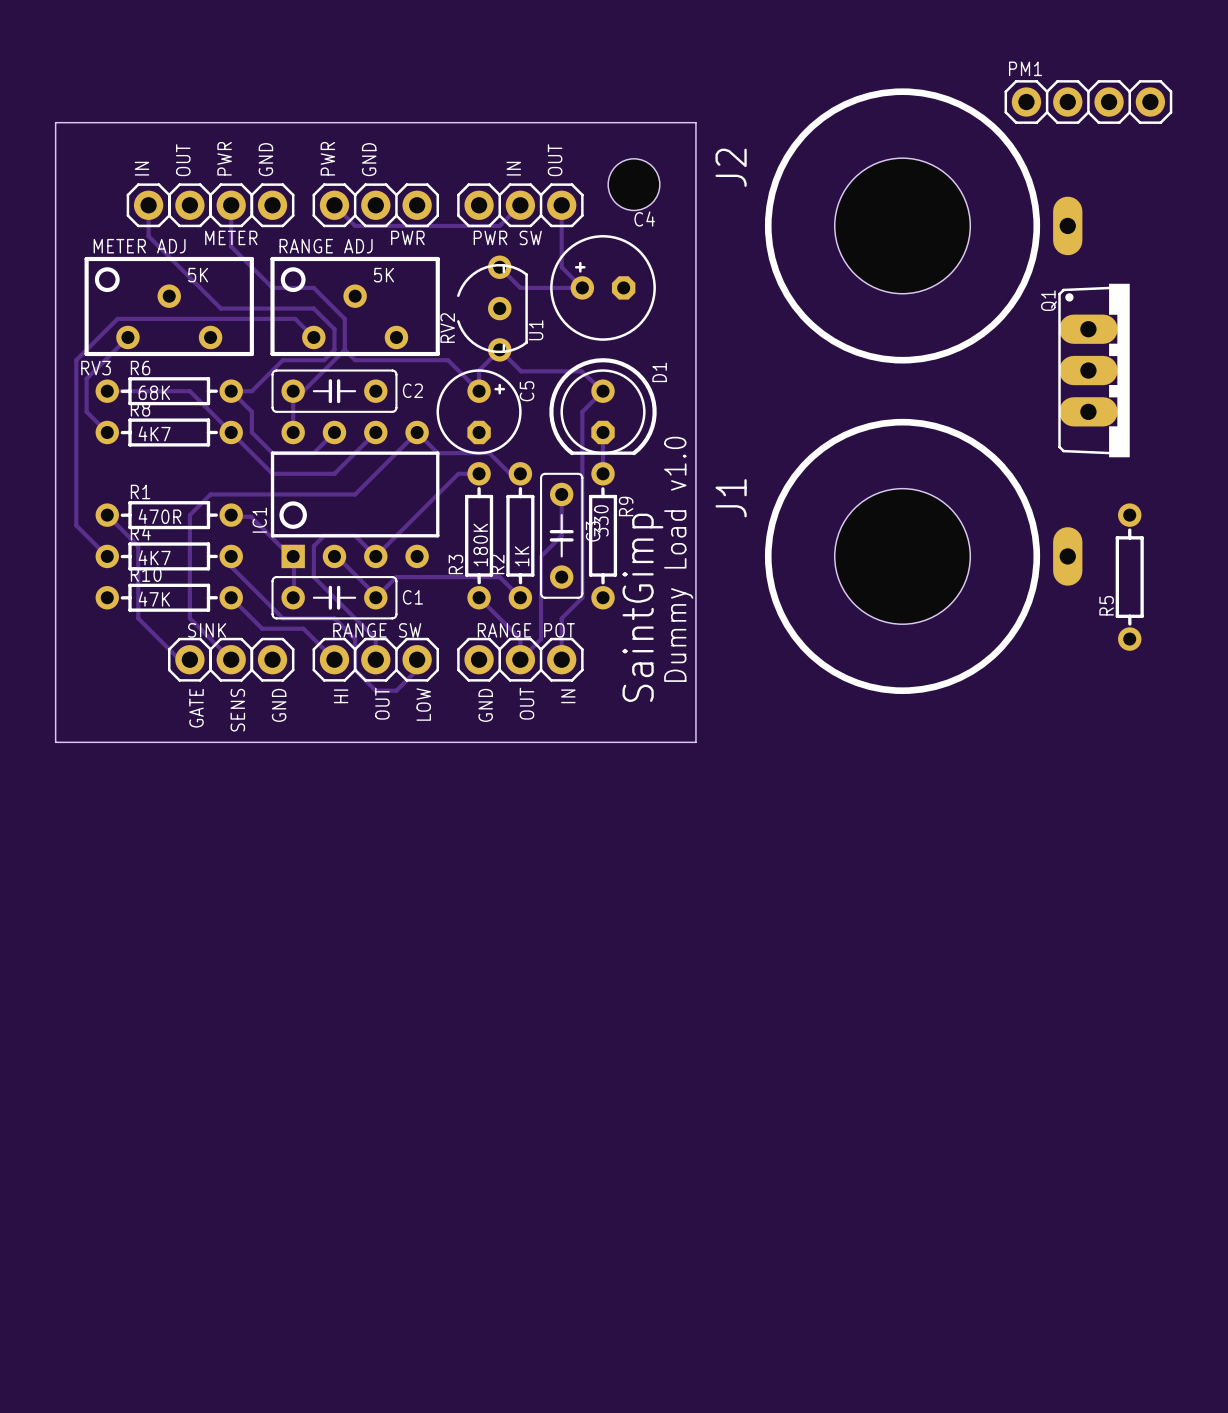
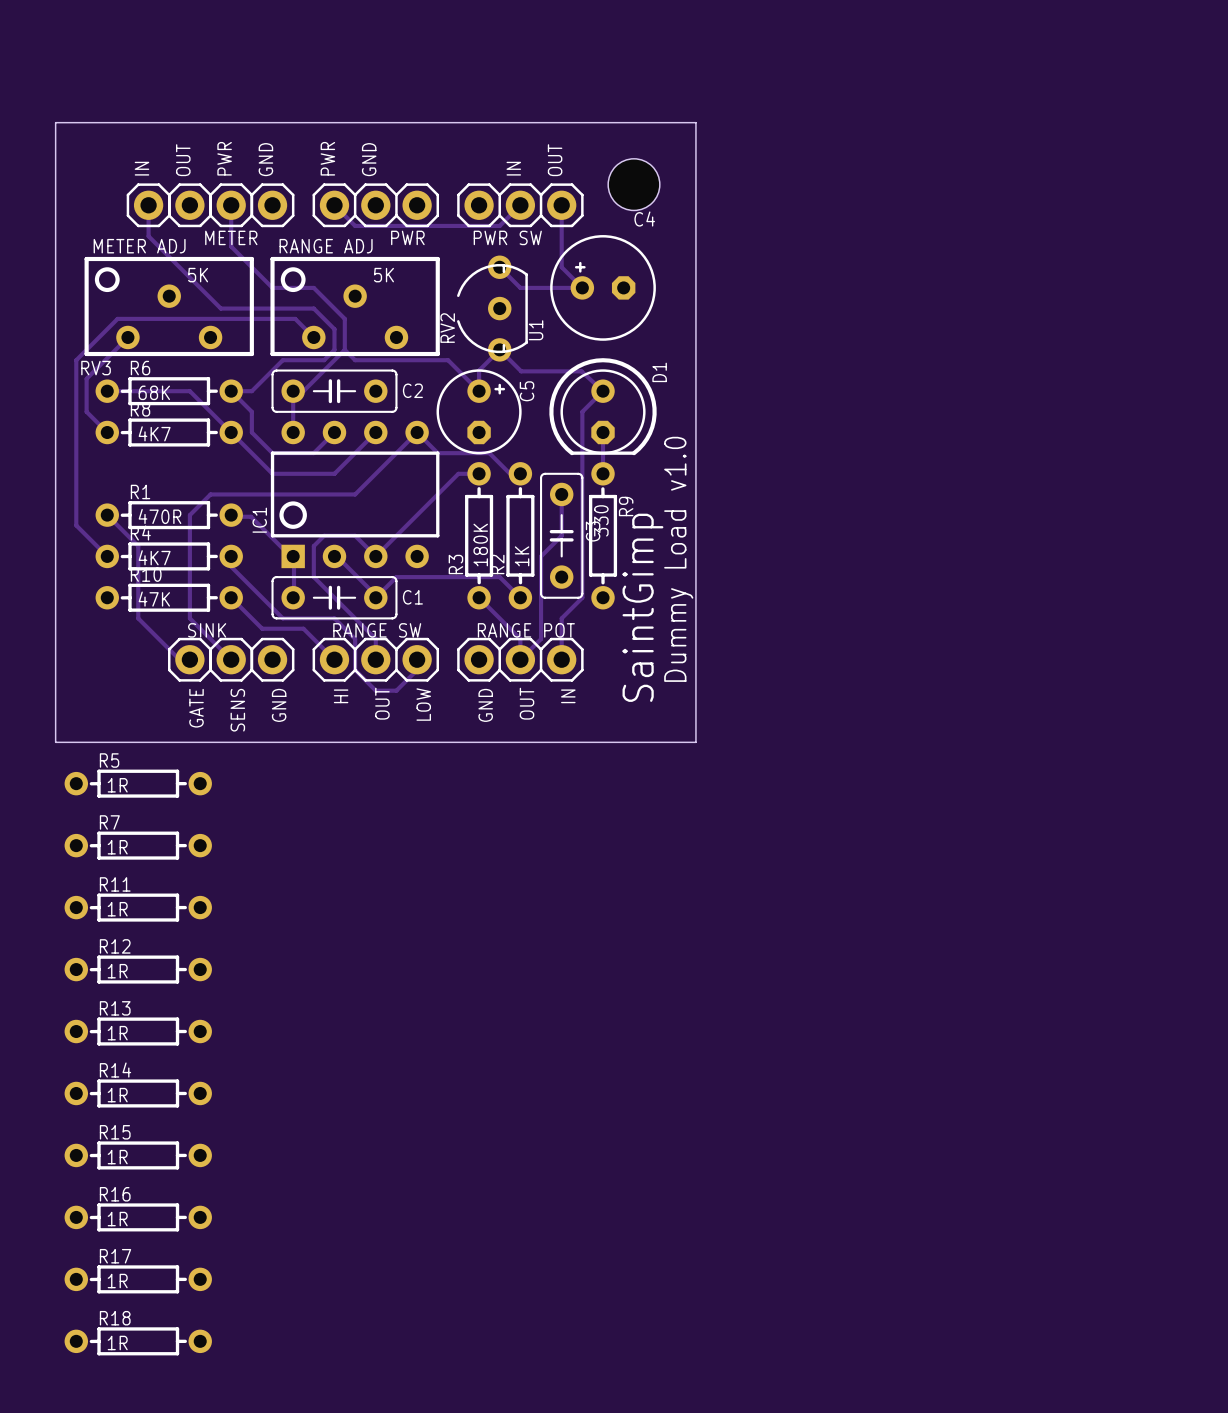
PM1: (1088, 102) -> none
J2: (923, 225) -> none
Q1: (1094, 370) -> none
J1: (923, 556) -> none
R5 rotation: 0° (1129, 577) -> 90° clockwise (138, 783)
R5 position: (1129, 577) -> (138, 783)
R5 value: none -> 1R (117, 785)
R7: none -> 1R (138, 845)
R11: none -> 1R (138, 907)
R12: none -> 1R (138, 969)
R13: none -> 1R (138, 1031)
R14: none -> 1R (138, 1093)
R15: none -> 1R (138, 1155)
R16: none -> 1R (138, 1217)
R17: none -> 1R (138, 1279)
R18: none -> 1R (138, 1341)

